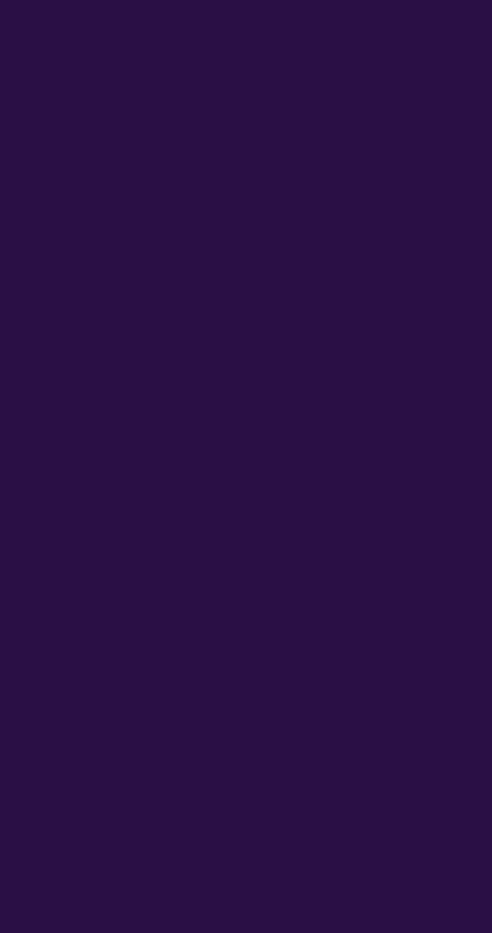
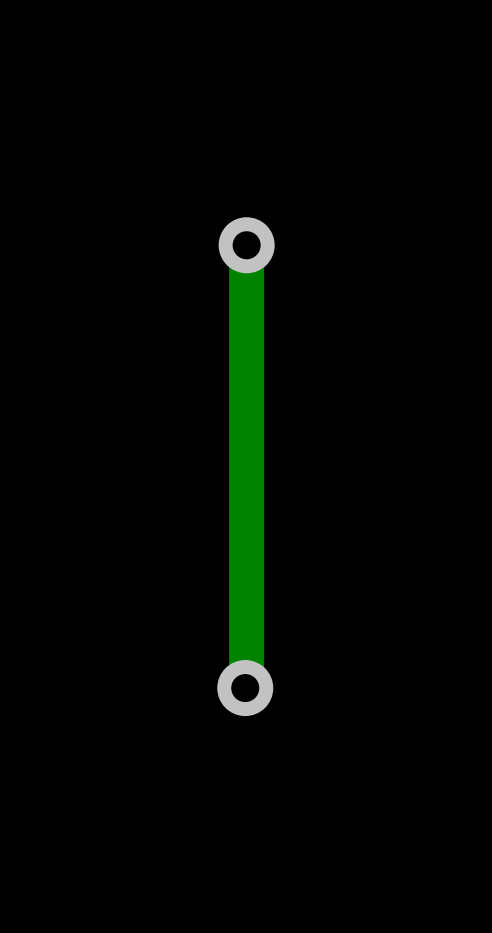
track: none -> (246, 245) (245, 688)
via: none -> (246, 245)
via: none -> (245, 688)

